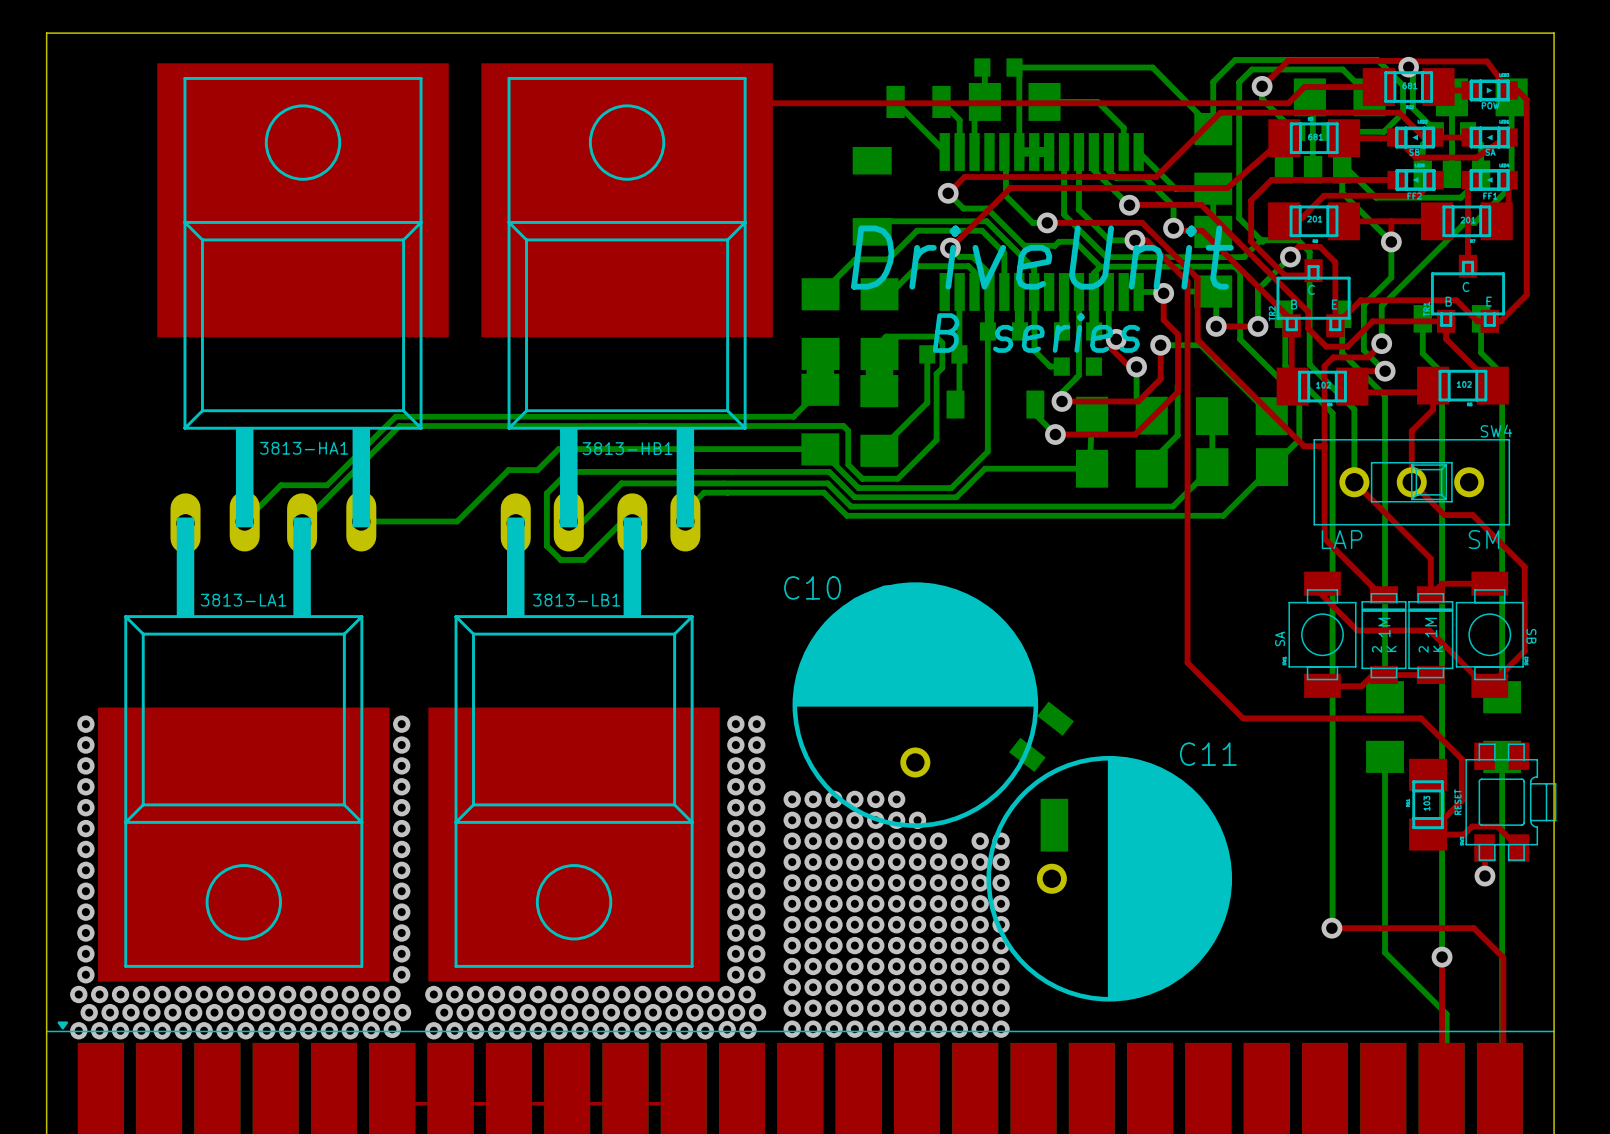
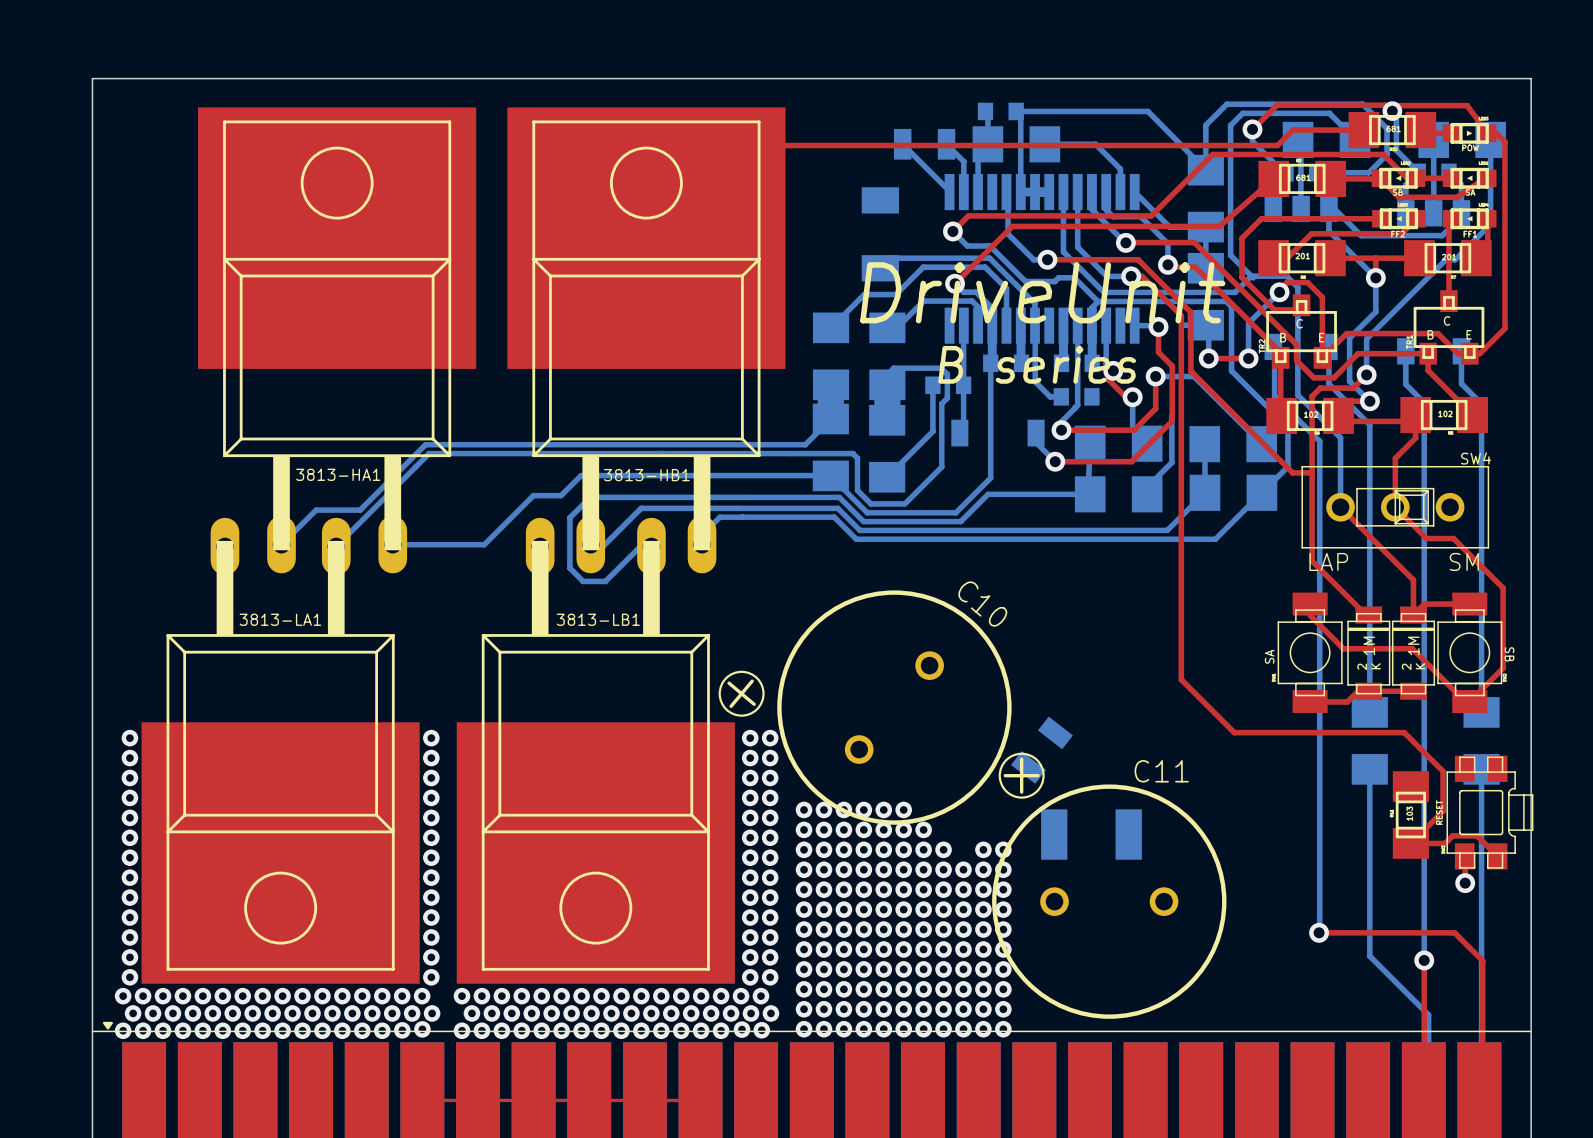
C10 footprint: [792, 582, 1039, 828] -> [718, 590, 1012, 825]
C10 name position: C10 (812, 587) -> C10 (982, 604)
C11 footprint: [986, 755, 1233, 1002] -> [992, 752, 1227, 1019]

